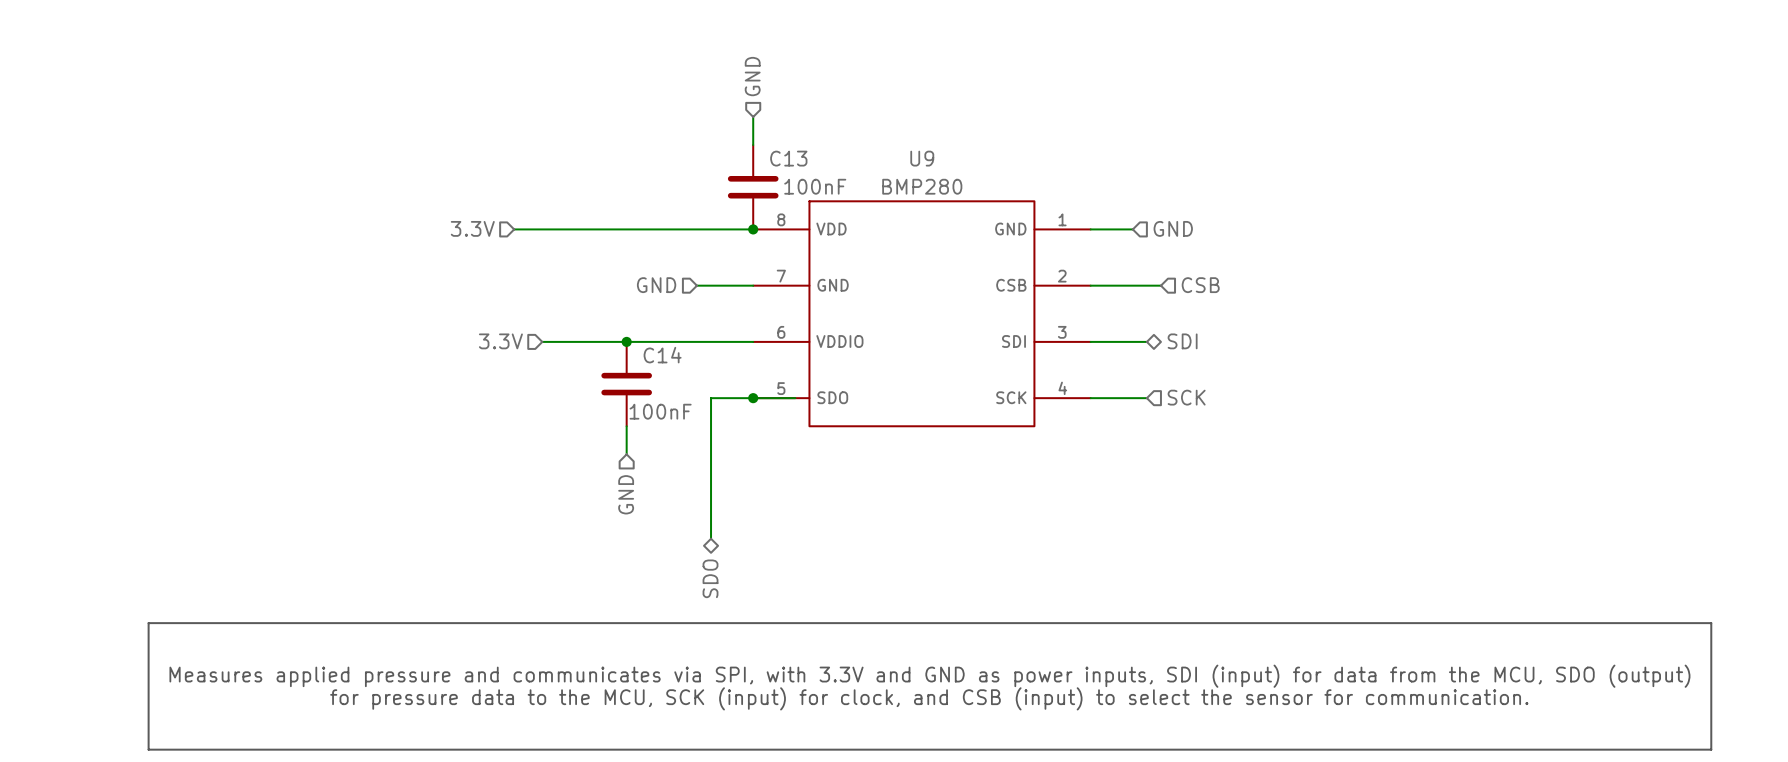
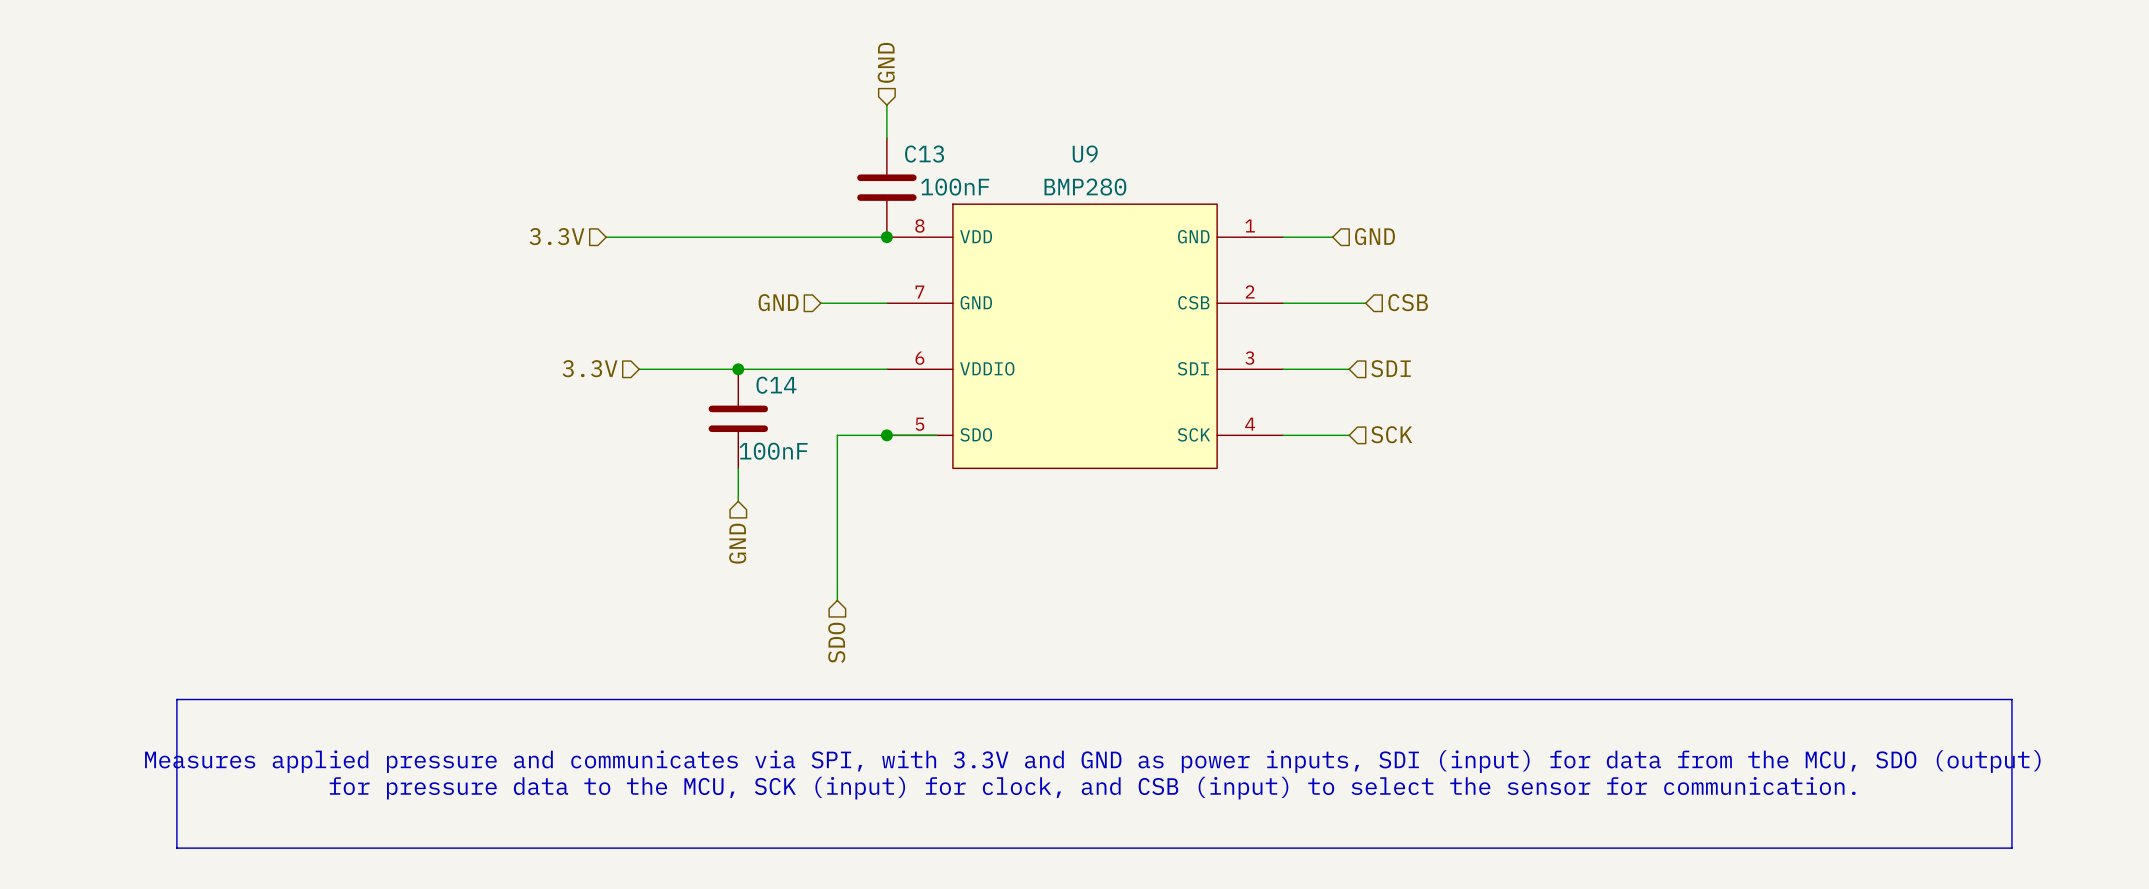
hierarchical label shape: bidirectional (1182, 341) -> input (1391, 368)
hierarchical label shape: bidirectional (710, 578) -> input (836, 642)

